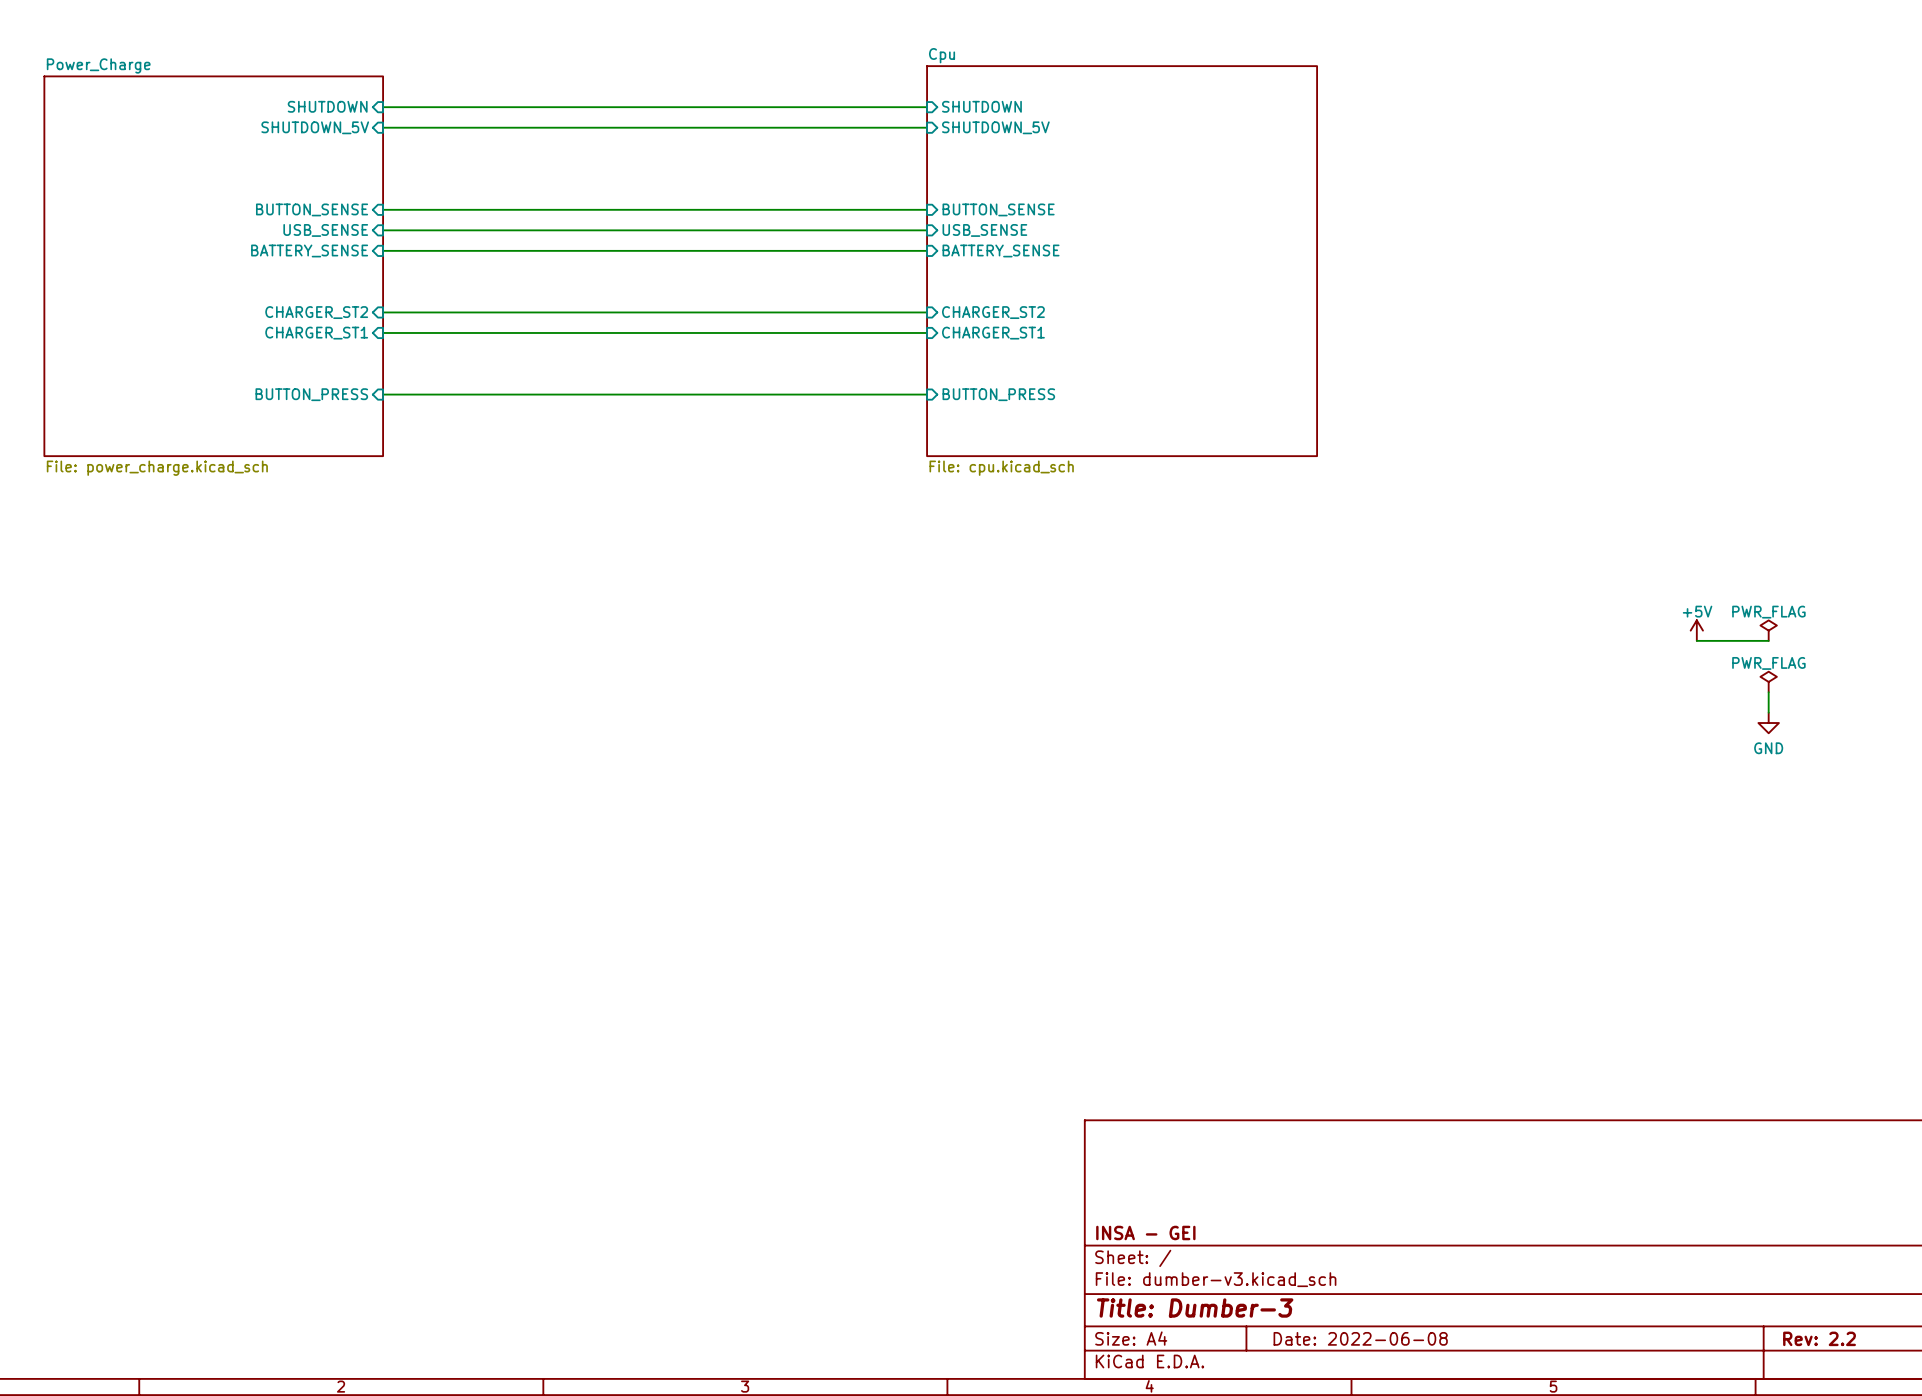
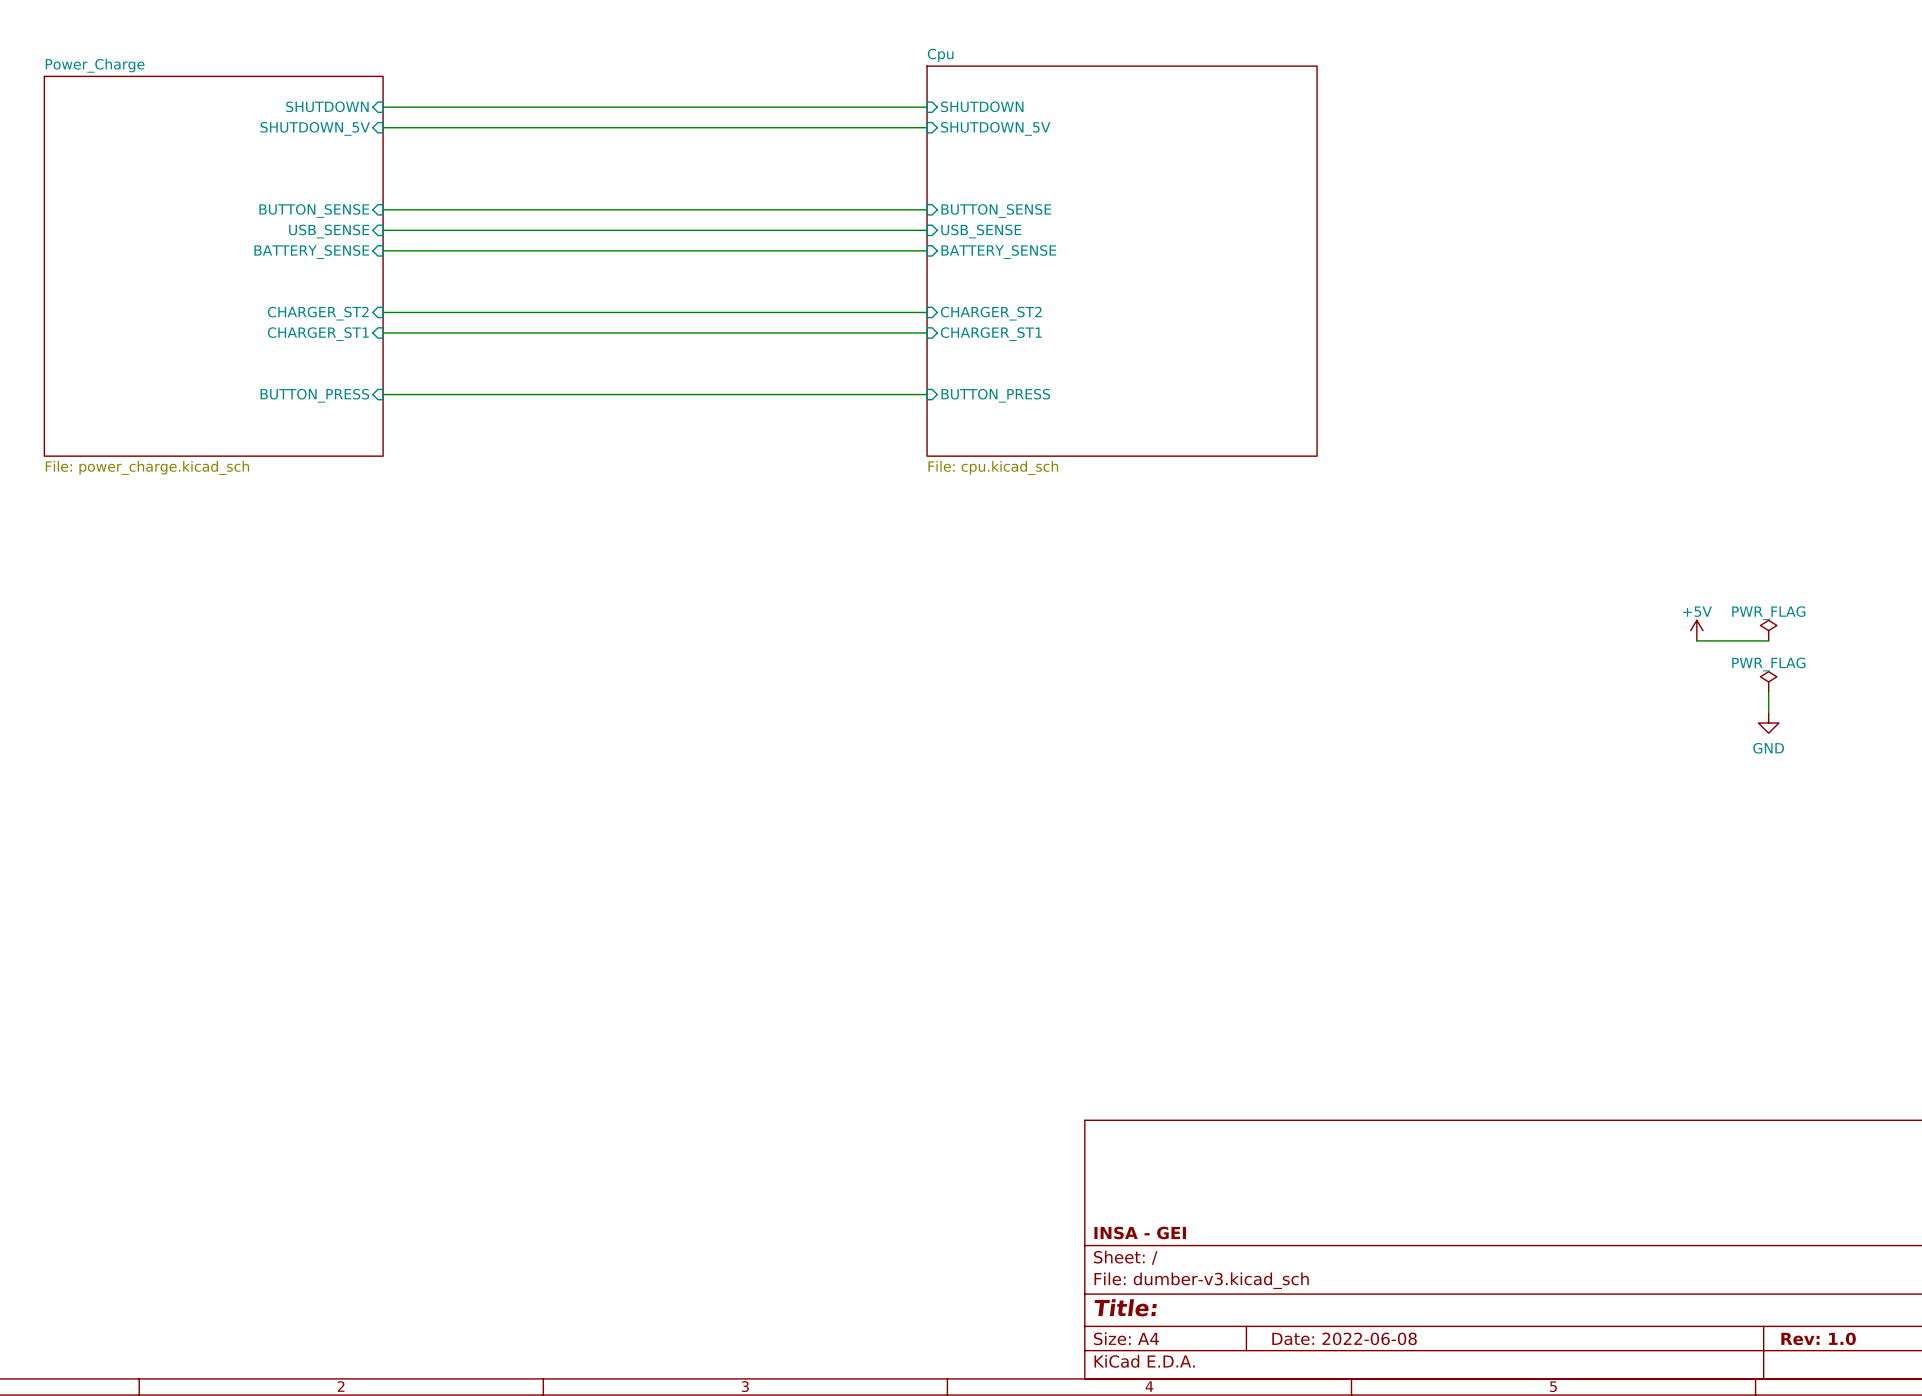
title block: Title: Dumber-3 (1195, 1308) -> Title: (1125, 1307)
title block: Rev: 2.2 (1819, 1338) -> Rev: 1.0 (1818, 1338)

